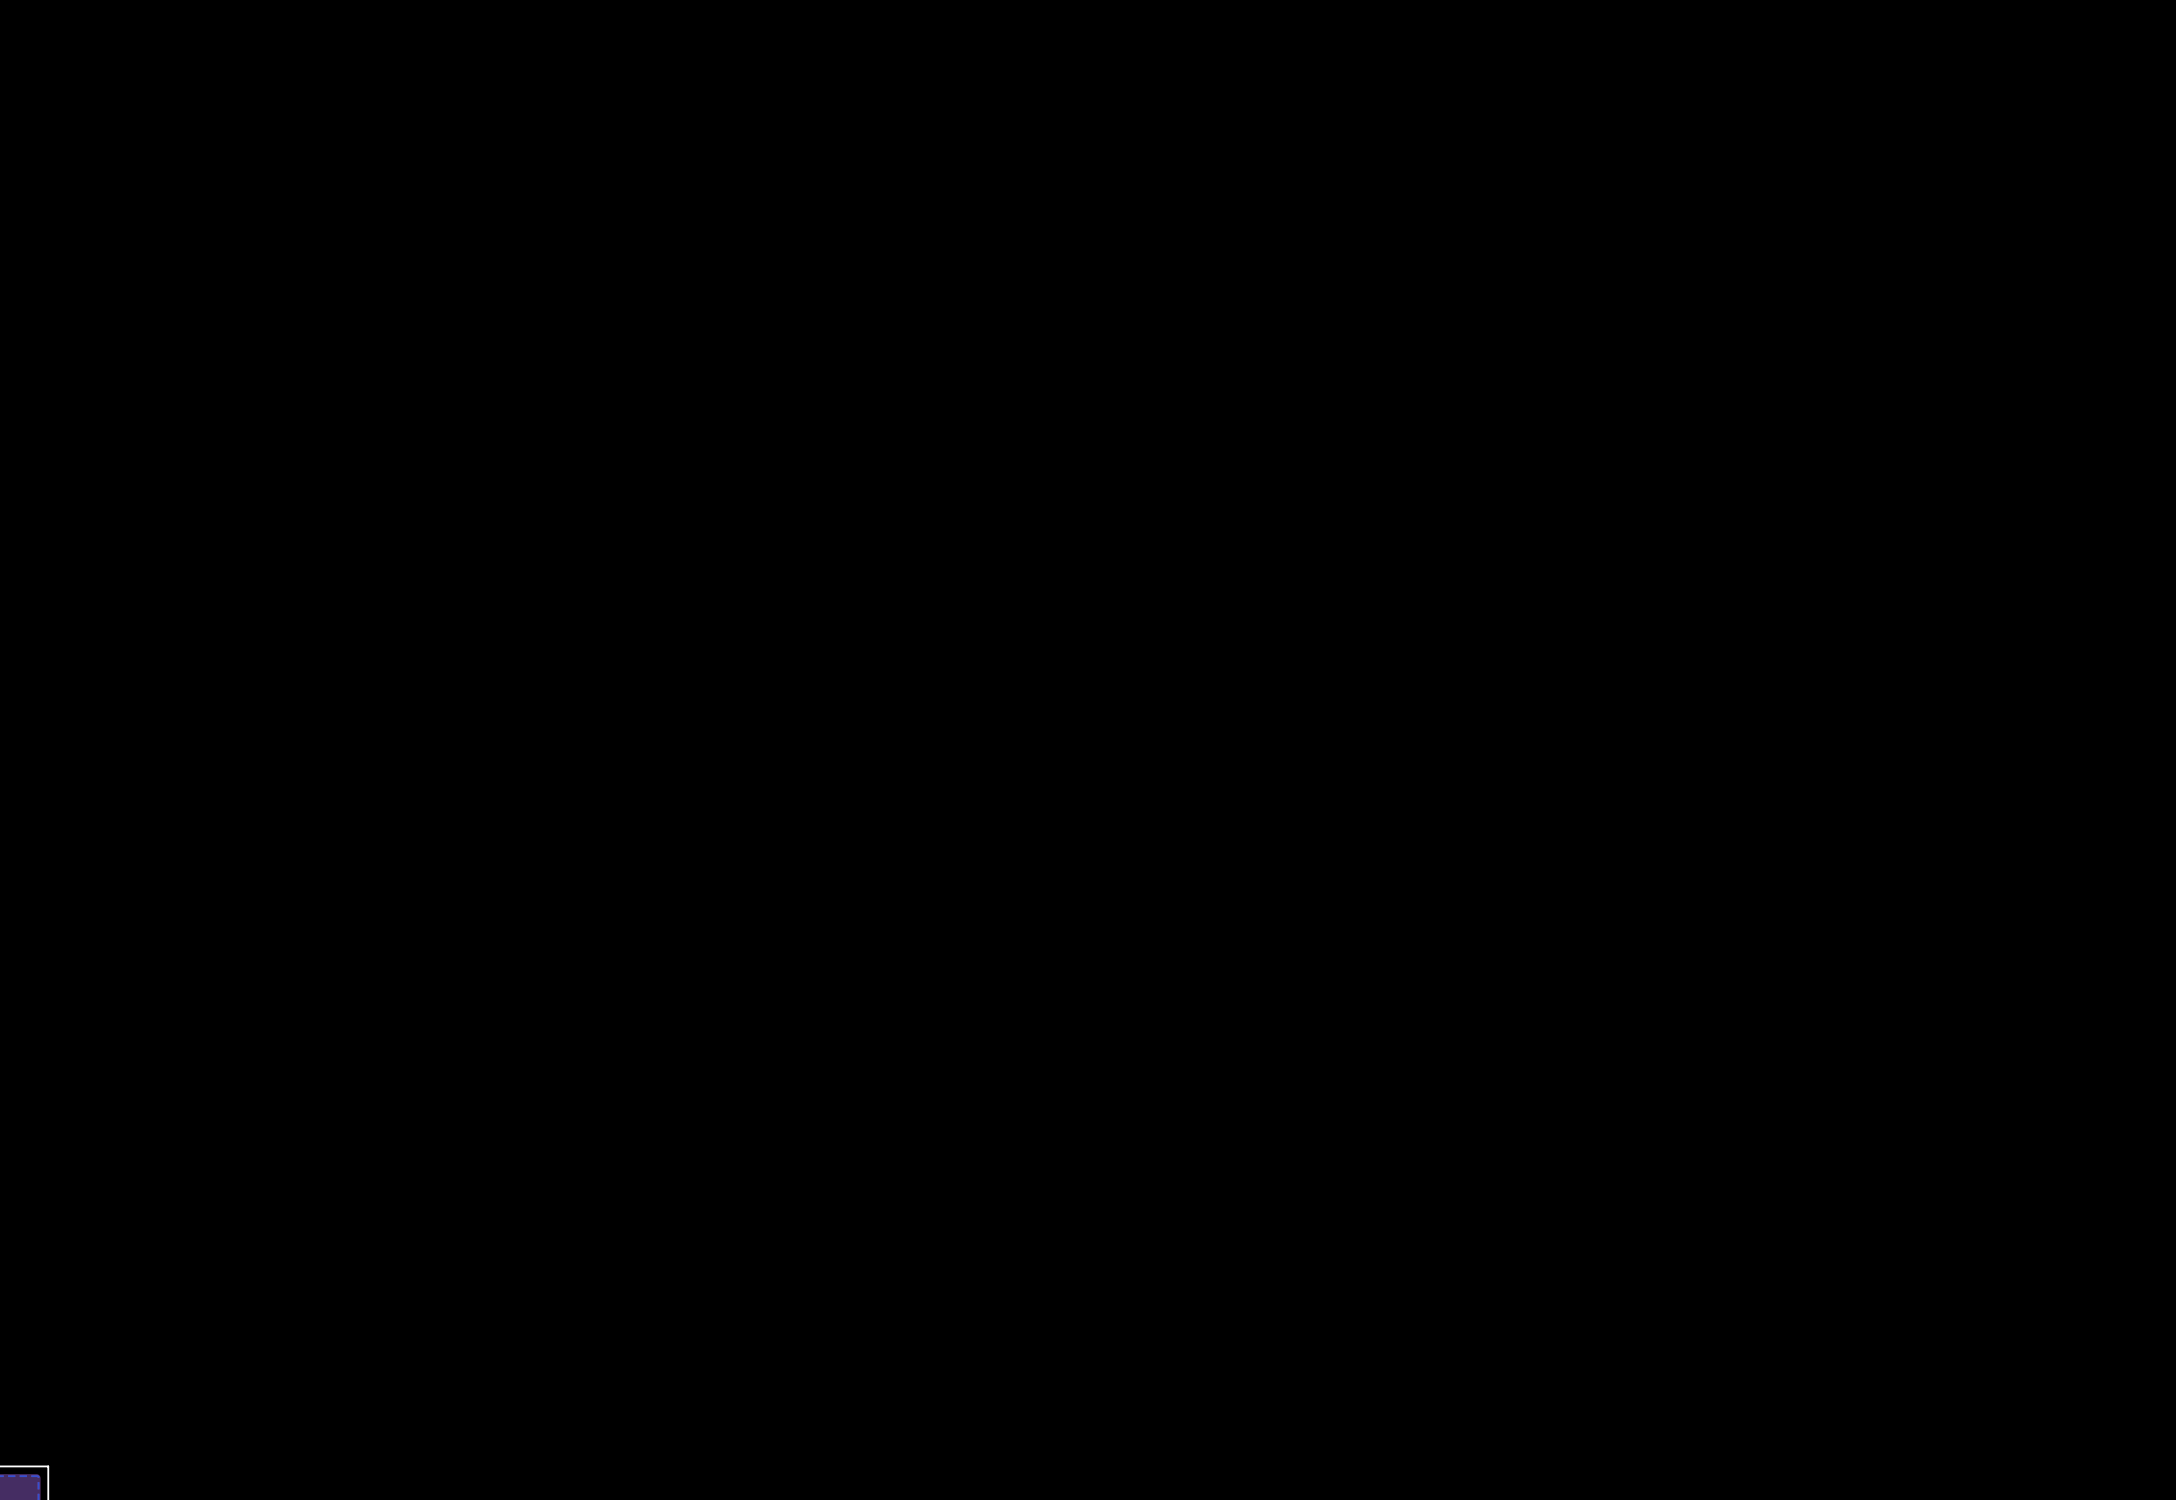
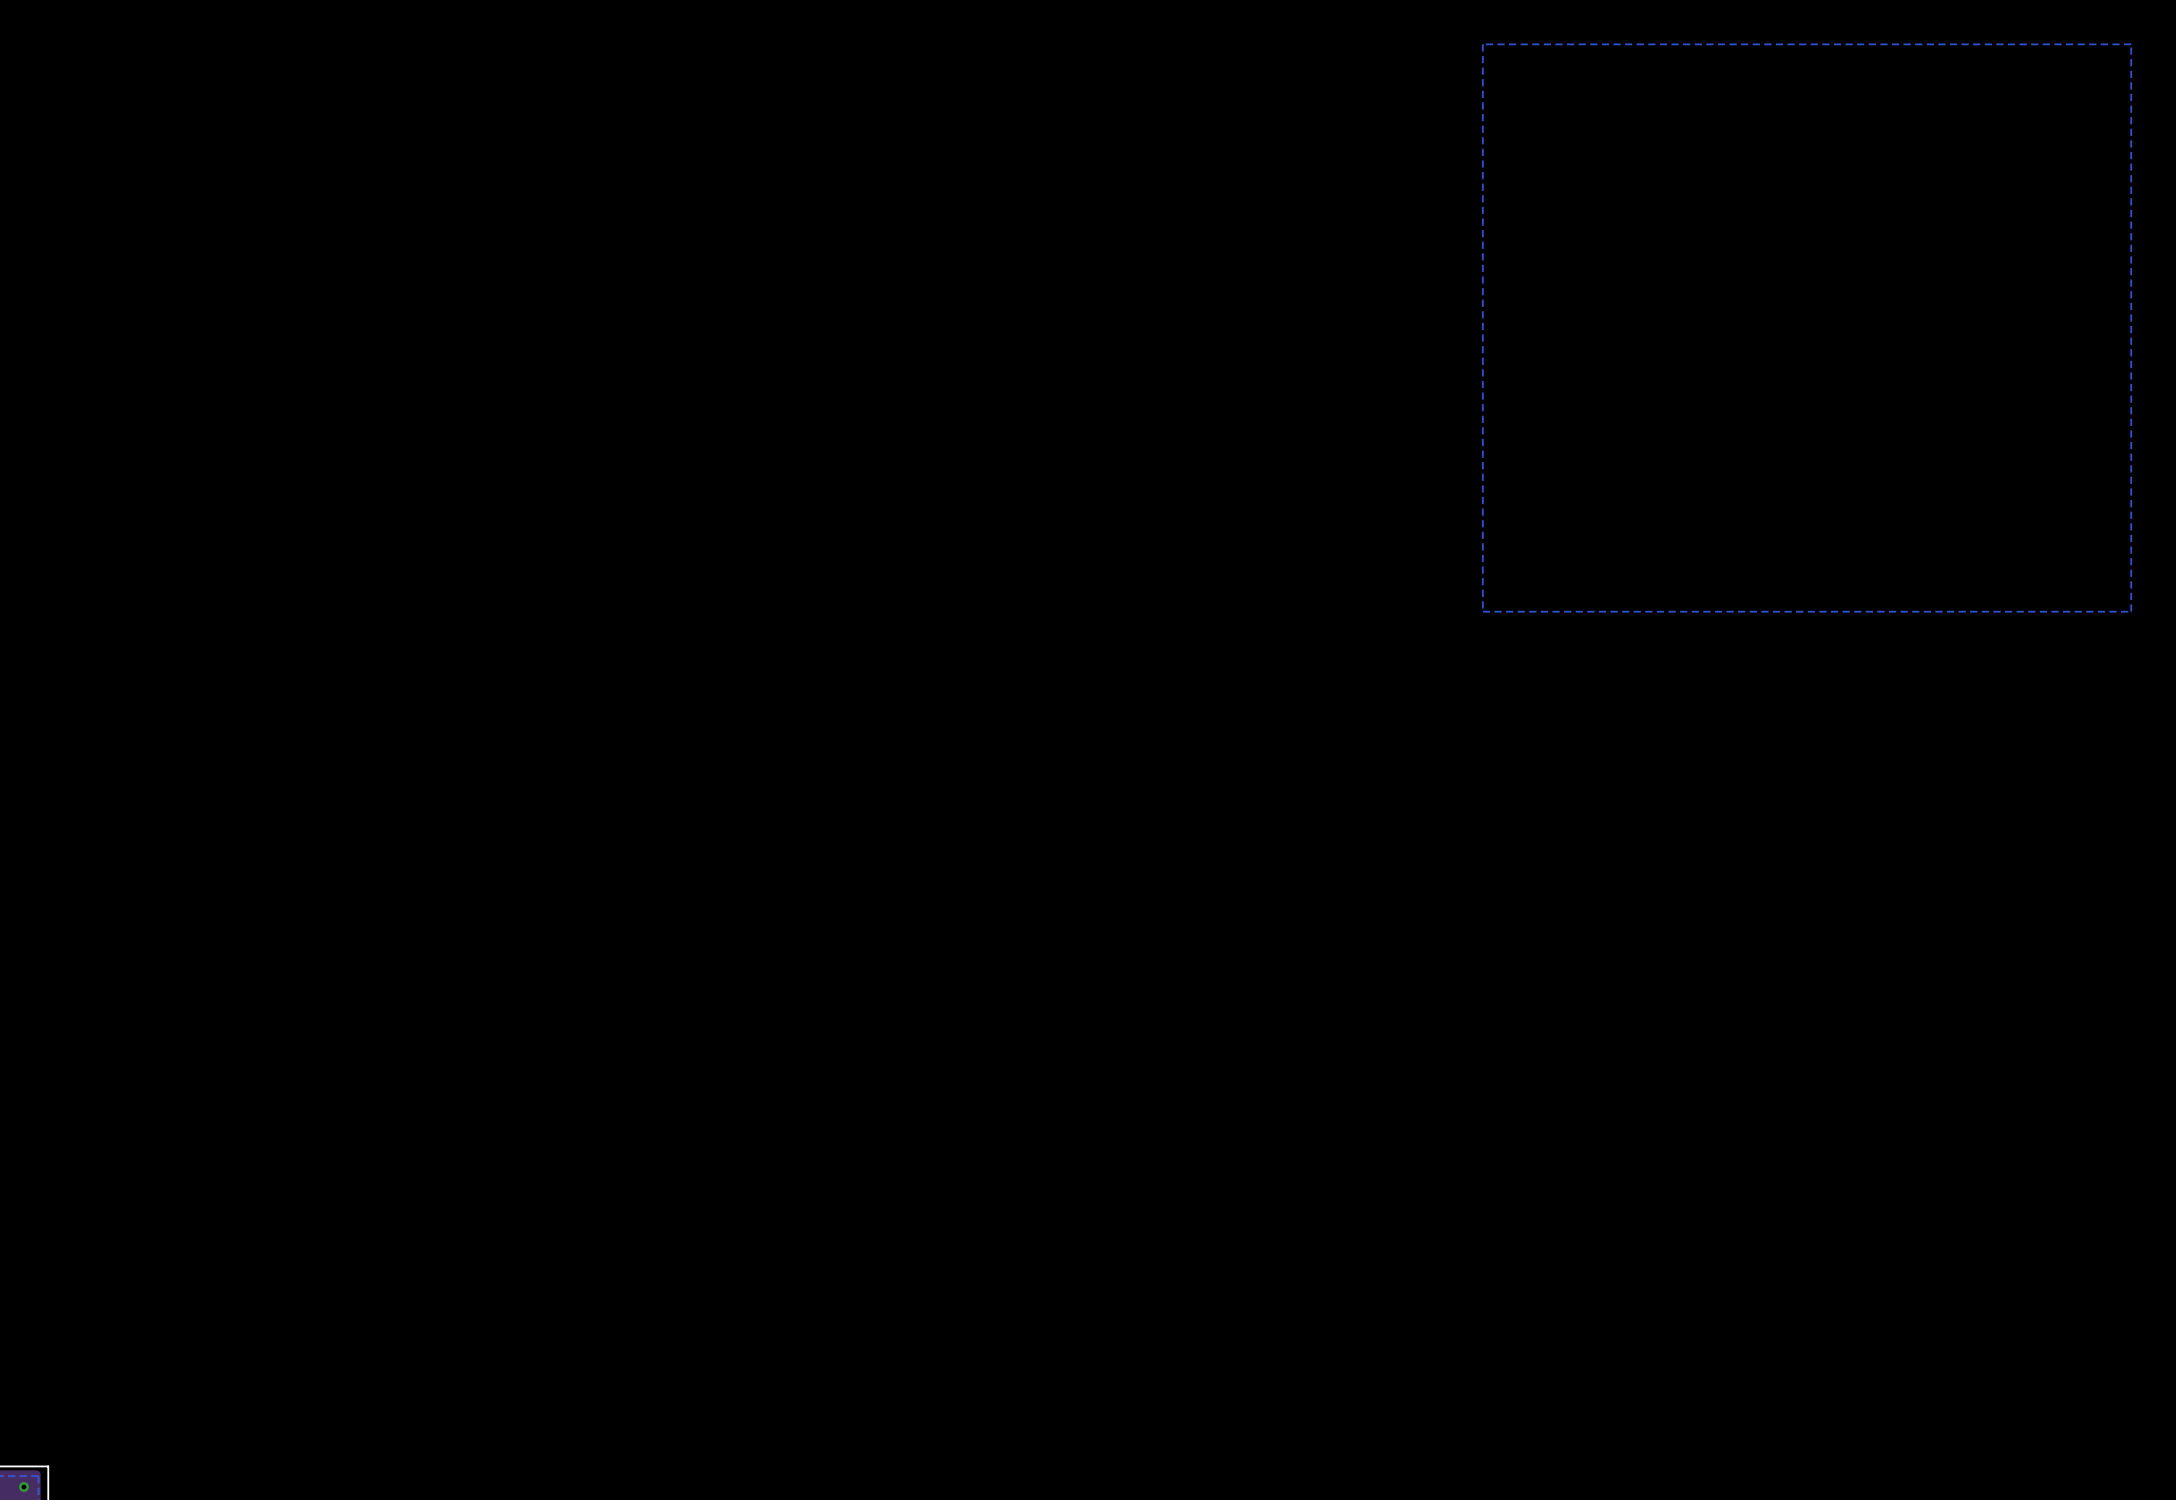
bottom zone outline: none -> (2131, 44) (1482, 44) (1482, 611) (2131, 611) (2131, 44)
via: none -> (23, 1487)

